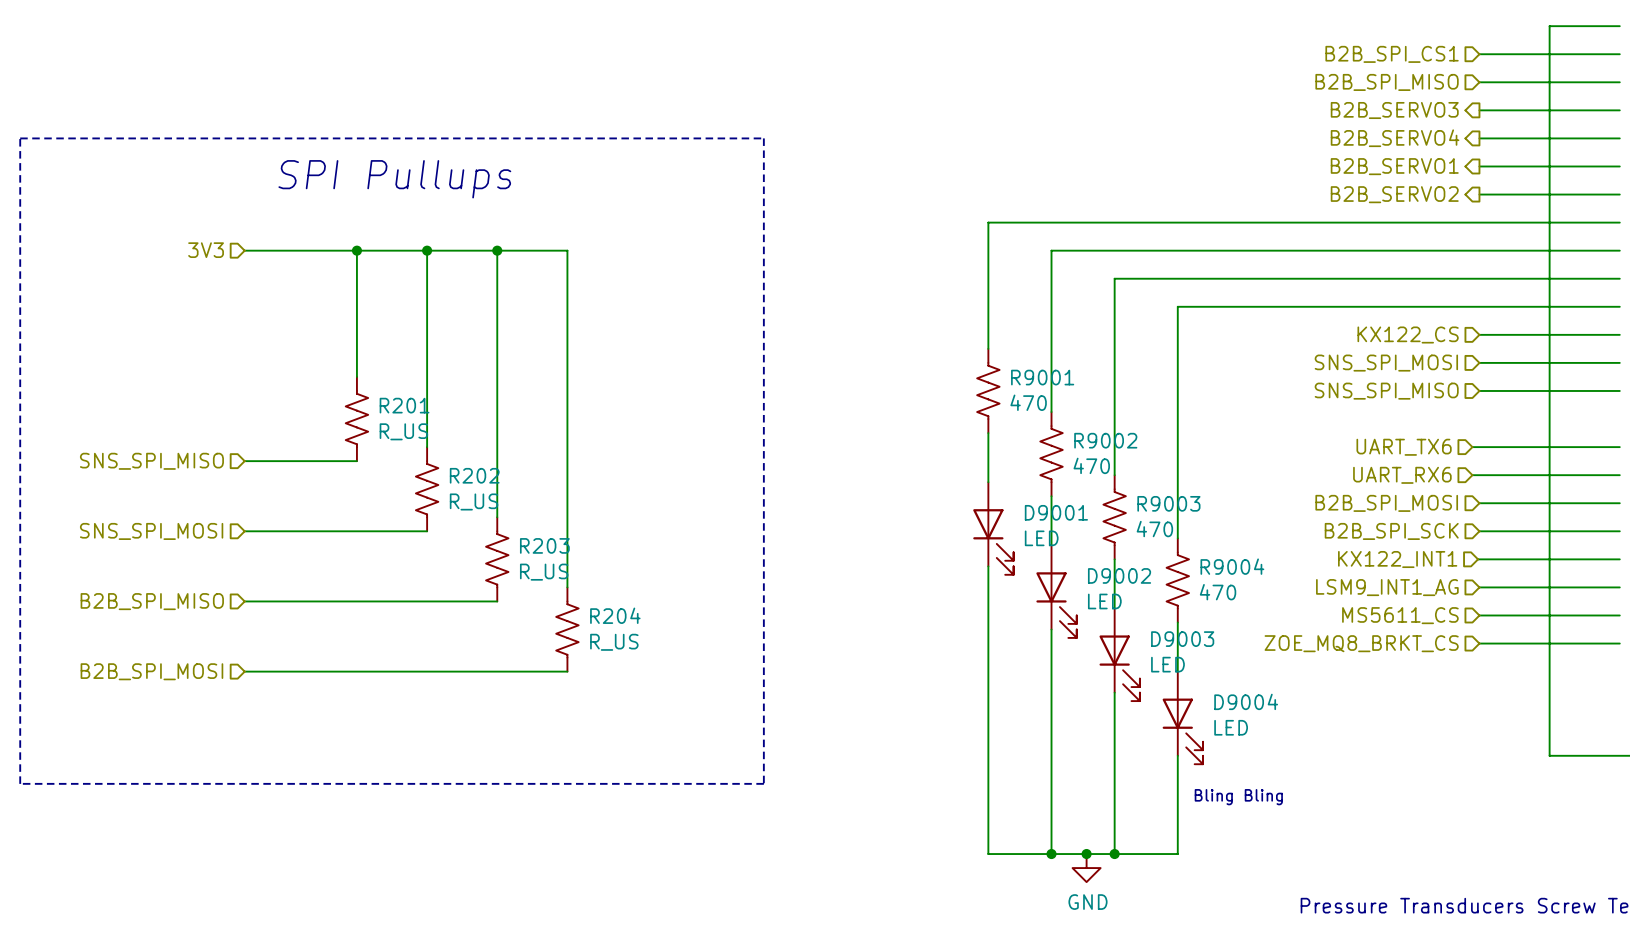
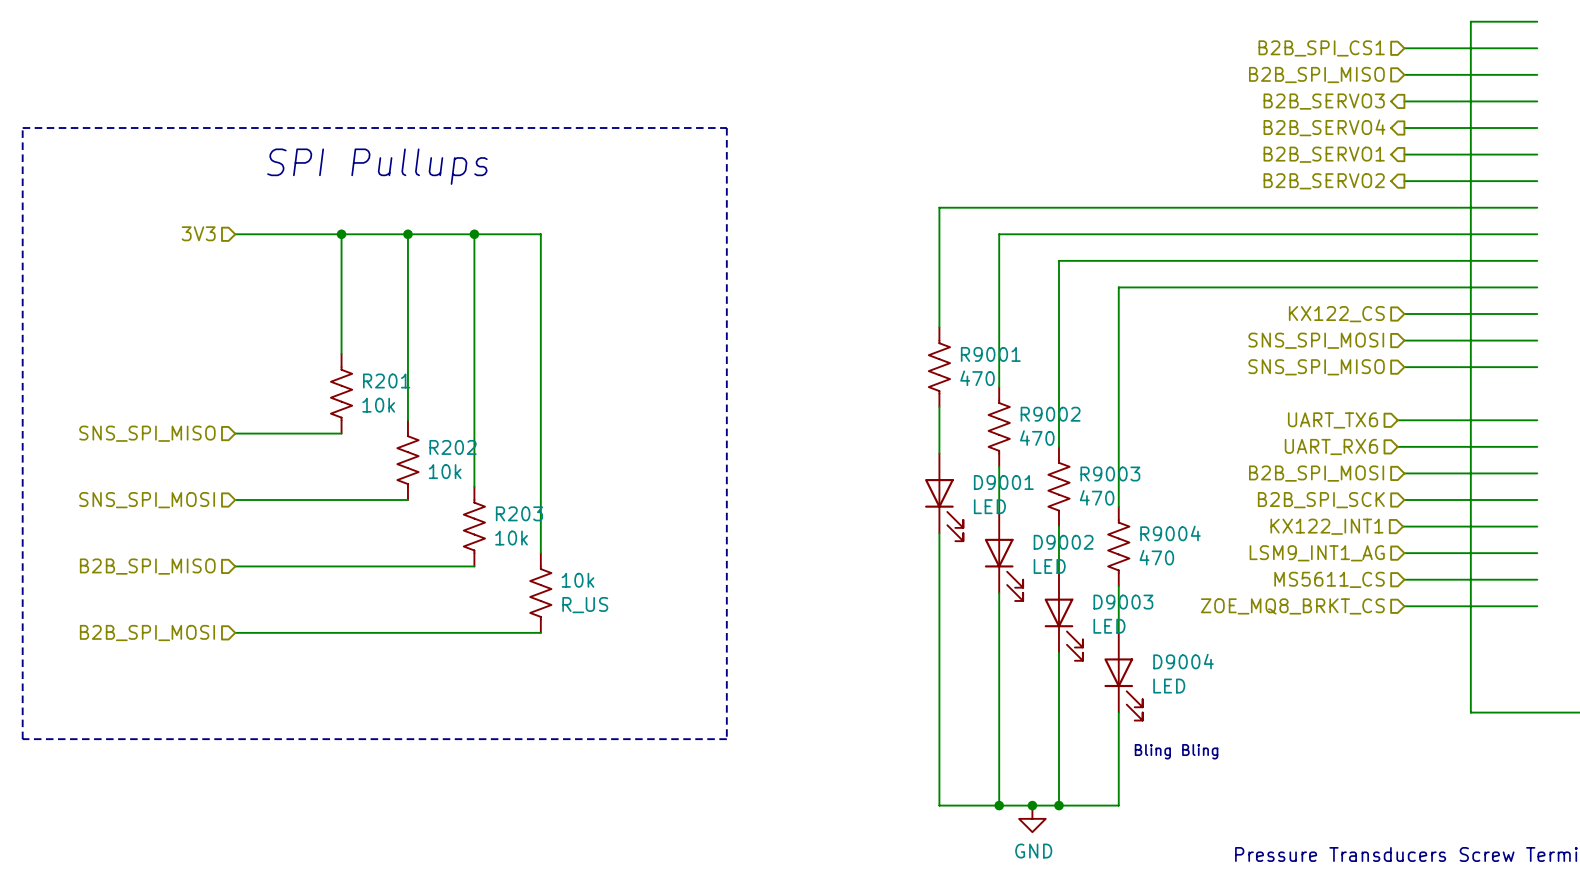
R201 value: R_US (403, 431) -> 10k (378, 405)
R202 value: R_US (474, 501) -> 10k (445, 471)
R203 value: R_US (544, 572) -> 10k (511, 538)
R204 name: R204 (615, 615) -> 10k (577, 580)

